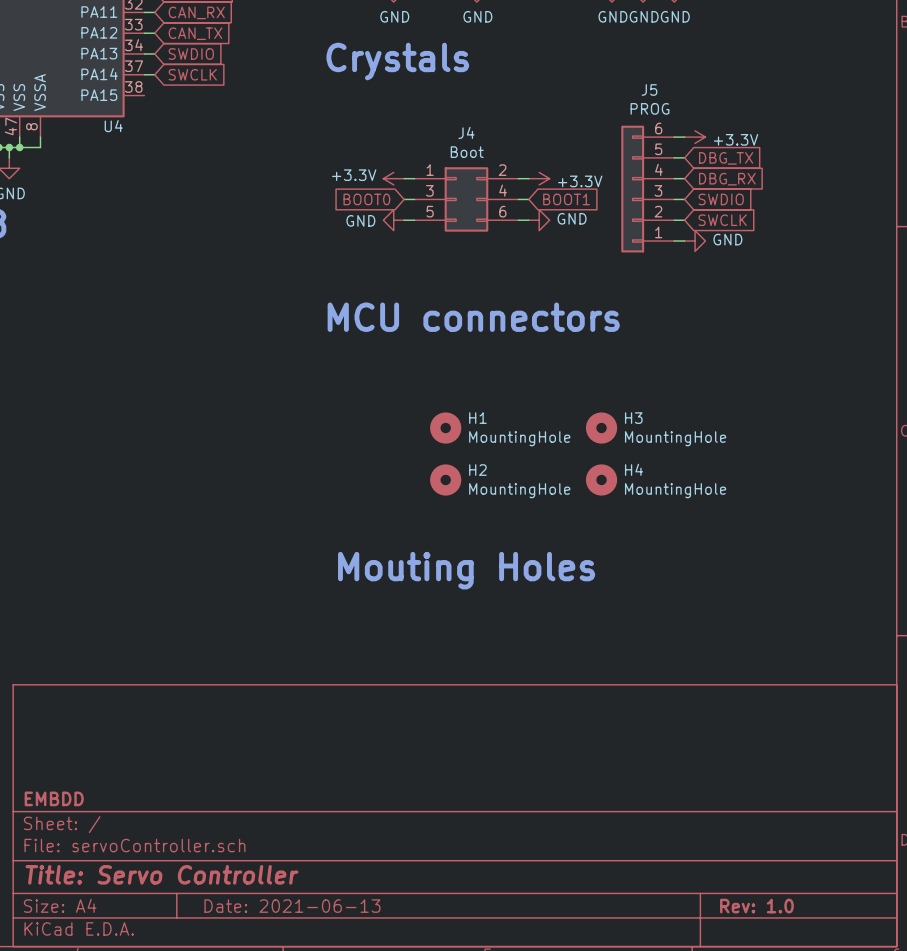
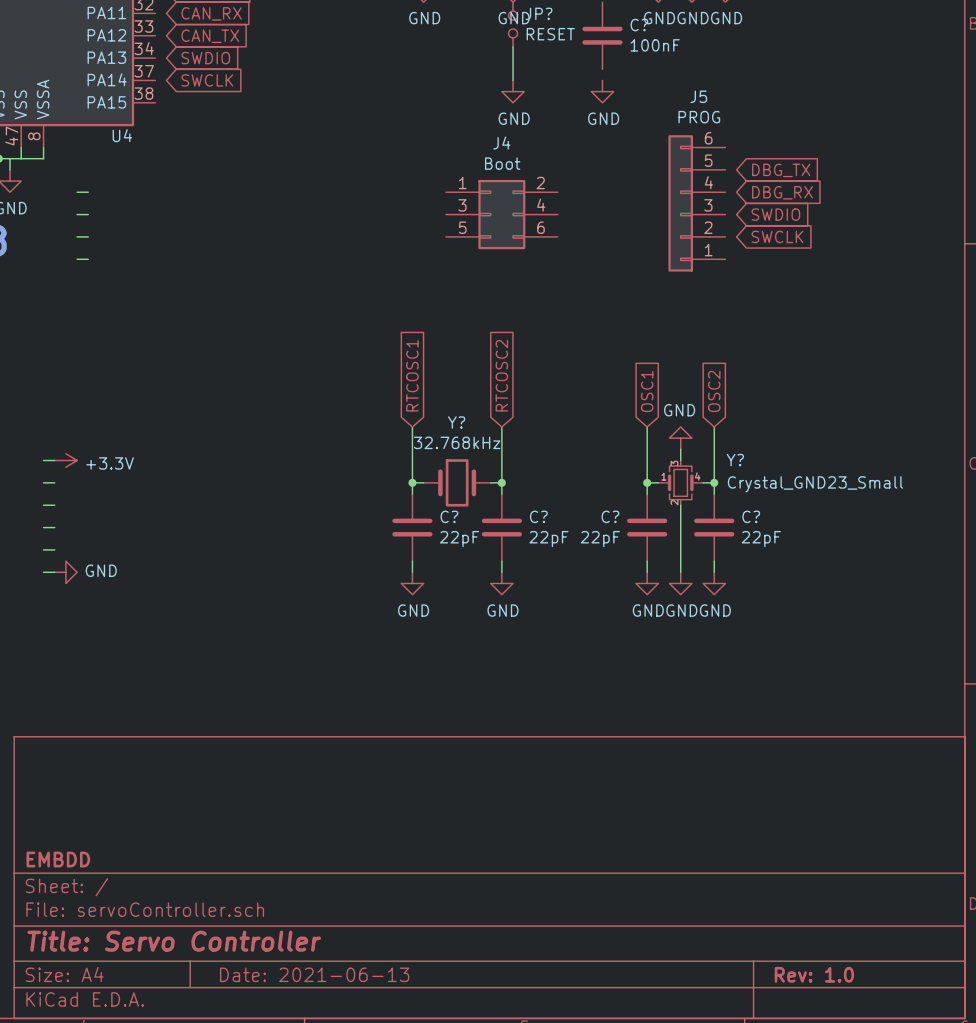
wire: (144, 12) (154, 12) -> (77, 192) (88, 192)
JP?: none -> RESET (513, 24)
wire: (144, 33) (154, 33) -> (77, 214) (88, 214)
C?: none -> 100nF (602, 35)
wire: none -> (513, 46) (513, 80)
wire: (144, 53) (154, 53) -> (77, 236) (88, 236)
text: Crystals (397, 61) -> none
wire: (144, 74) (154, 74) -> (77, 259) (88, 259)
power symbol: none -> GND (513, 91)
power symbol: none -> GND (602, 91)
wire: (674, 137) (684, 137) -> none
power symbol: +3.3V (695, 137) -> none
junction: (9, 147) -> none
junction: (19, 147) -> none
wire: (674, 157) (684, 157) -> none
power symbol: +3.3V (393, 178) -> none
wire: (404, 178) (414, 178) -> none
wire: (518, 178) (528, 178) -> none
power symbol: +3.3V (539, 178) -> none
wire: (674, 178) (684, 178) -> none
global label: BOOT0 (366, 199) -> none
wire: (404, 199) (414, 199) -> none
wire: (518, 199) (528, 199) -> none
global label: BOOT1 (566, 199) -> none
wire: (674, 199) (684, 199) -> none
power symbol: GND (393, 220) -> none
wire: (404, 220) (414, 220) -> none
wire: (518, 220) (528, 220) -> none
power symbol: GND (539, 220) -> none
wire: (674, 220) (684, 220) -> none
wire: (674, 241) (684, 241) -> none
power symbol: GND (695, 241) -> none
text: MCU connectors (473, 317) -> none
global label: none -> RTCOSC1 (412, 375)
global label: none -> RTCOSC2 (501, 375)
global label: none -> OSC1 (647, 391)
global label: none -> OSC2 (714, 391)
wire: none -> (412, 426) (412, 494)
wire: none -> (501, 426) (501, 494)
wire: none -> (647, 426) (647, 494)
wire: none -> (714, 426) (714, 494)
power symbol: none -> GND (680, 438)
wire: none -> (680, 449) (680, 460)
wire: none -> (43, 460) (54, 460)
power symbol: none -> +3.3V (65, 460)
H1: MountingHole (445, 428) -> none
H3: MountingHole (601, 428) -> none
wire: none -> (43, 482) (54, 482)
wire: none -> (412, 482) (423, 482)
junction: none -> (412, 482)
Y?: none -> 32.768kHz (457, 482)
wire: none -> (490, 482) (501, 482)
junction: none -> (501, 482)
wire: none -> (647, 482) (658, 482)
junction: none -> (647, 482)
Y?: none -> Crystal_GND23_Small (680, 482)
wire: none -> (703, 482) (714, 482)
junction: none -> (714, 482)
wire: none -> (43, 505) (54, 505)
wire: none -> (680, 505) (680, 572)
H2: MountingHole (445, 479) -> none
H4: MountingHole (601, 479) -> none
wire: none -> (43, 527) (54, 527)
C?: none -> 22pF (412, 527)
C?: none -> 22pF (501, 527)
C?: none -> 22pF (647, 527)
C?: none -> 22pF (714, 527)
wire: none -> (43, 549) (54, 549)
wire: none -> (412, 561) (412, 572)
wire: none -> (501, 561) (501, 572)
wire: none -> (647, 561) (647, 572)
wire: none -> (714, 561) (714, 572)
wire: none -> (43, 572) (54, 572)
power symbol: none -> GND (65, 572)
power symbol: none -> GND (412, 583)
power symbol: none -> GND (501, 583)
power symbol: none -> GND (647, 583)
power symbol: none -> GND (680, 583)
power symbol: none -> GND (714, 583)
text: Mouting Holes (466, 570) -> none

